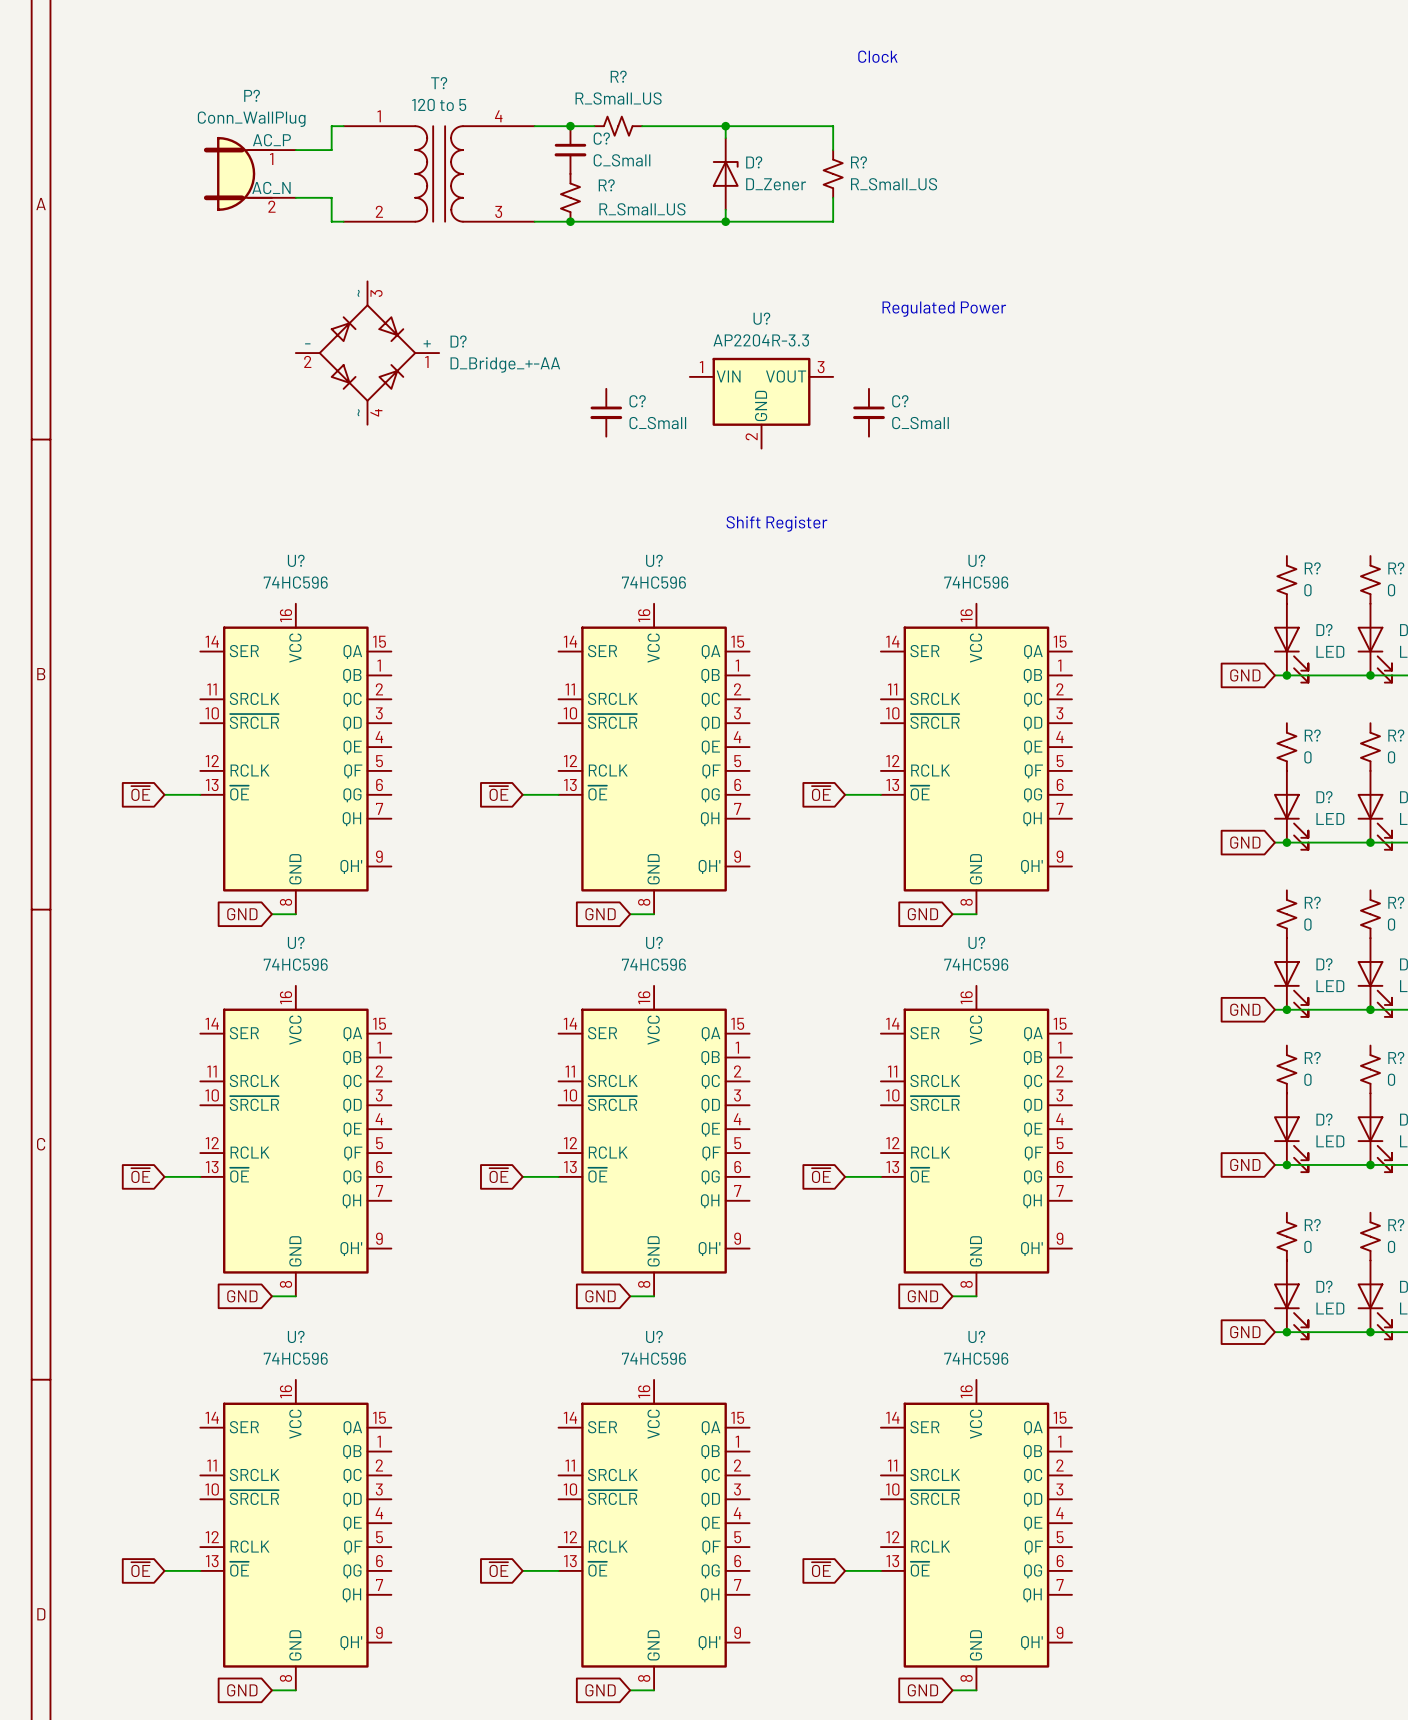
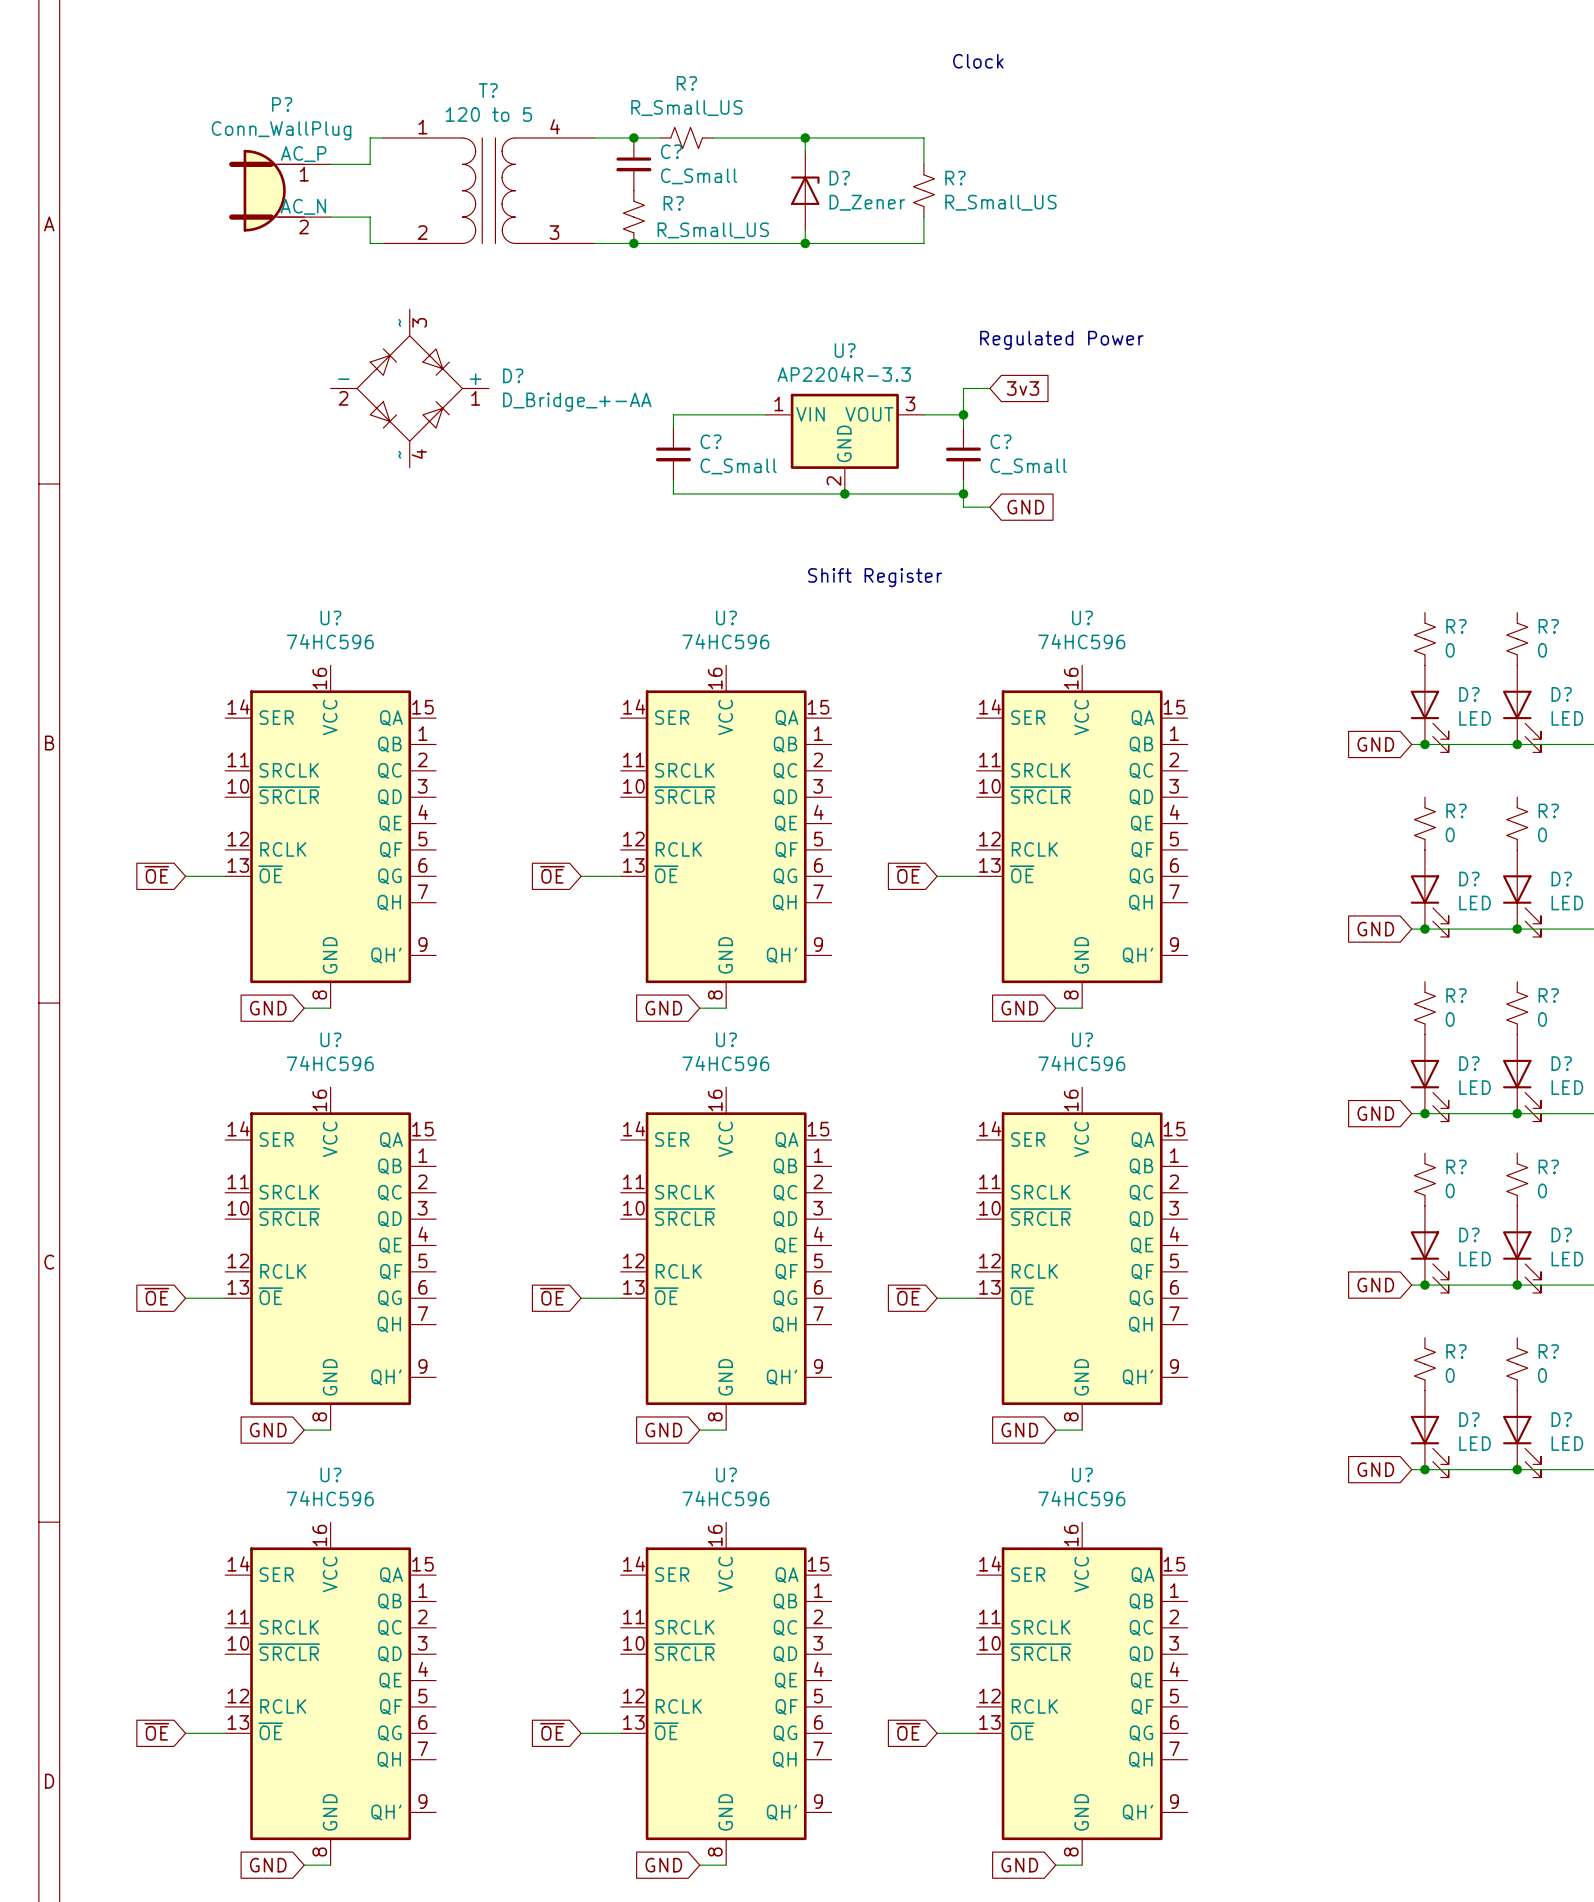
wire: none -> (989, 388) (963, 388) (963, 428)
global label: none -> 3v3 (1023, 388)
wire: none -> (765, 414) (673, 414) (673, 428)
wire: none -> (923, 414) (963, 414)
junction: none -> (963, 414)
wire: none -> (673, 480) (673, 493) (963, 493)
wire: none -> (963, 480) (963, 507) (989, 507)
junction: none -> (844, 493)
junction: none -> (963, 493)
global label: none -> GND (1025, 507)

